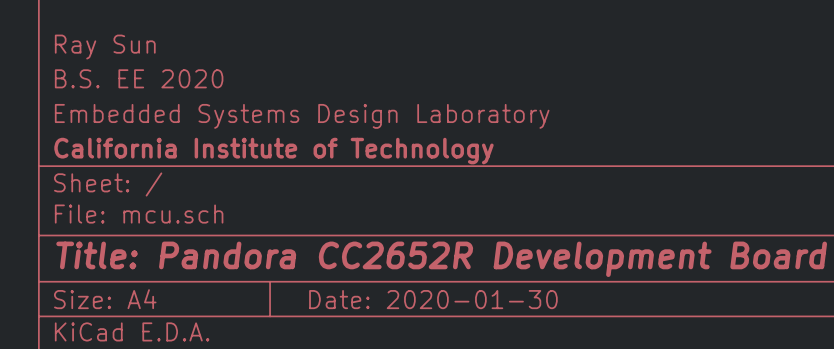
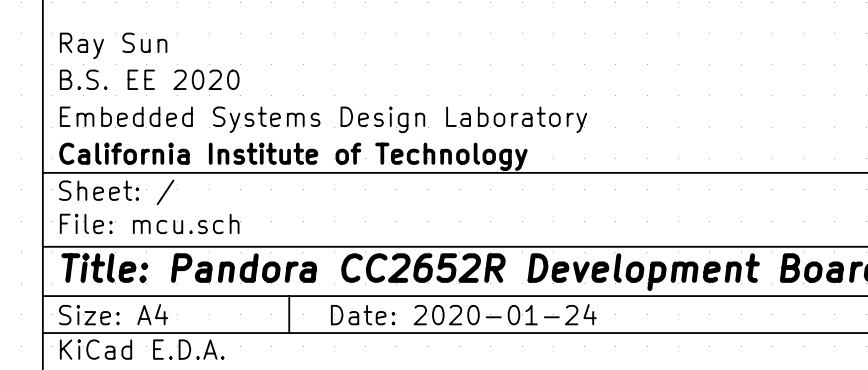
title block: Date: 2020-01-30 (433, 299) -> Date: 2020-01-24 (463, 314)

